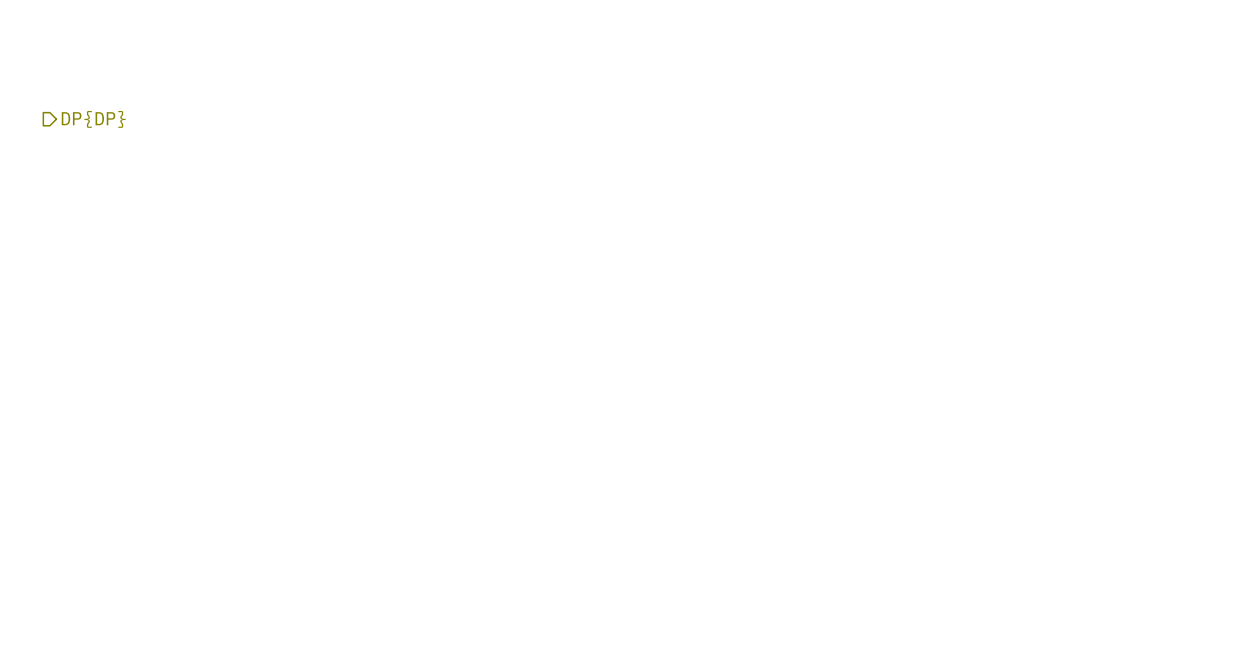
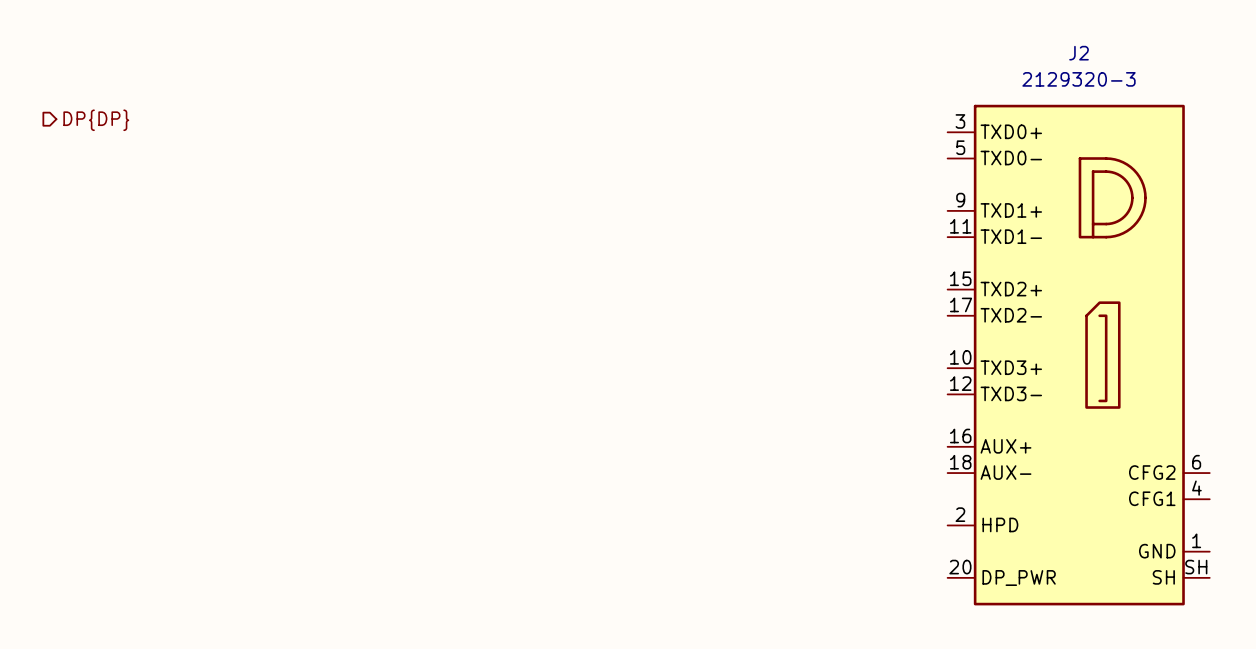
J2: none -> (1078, 355)

